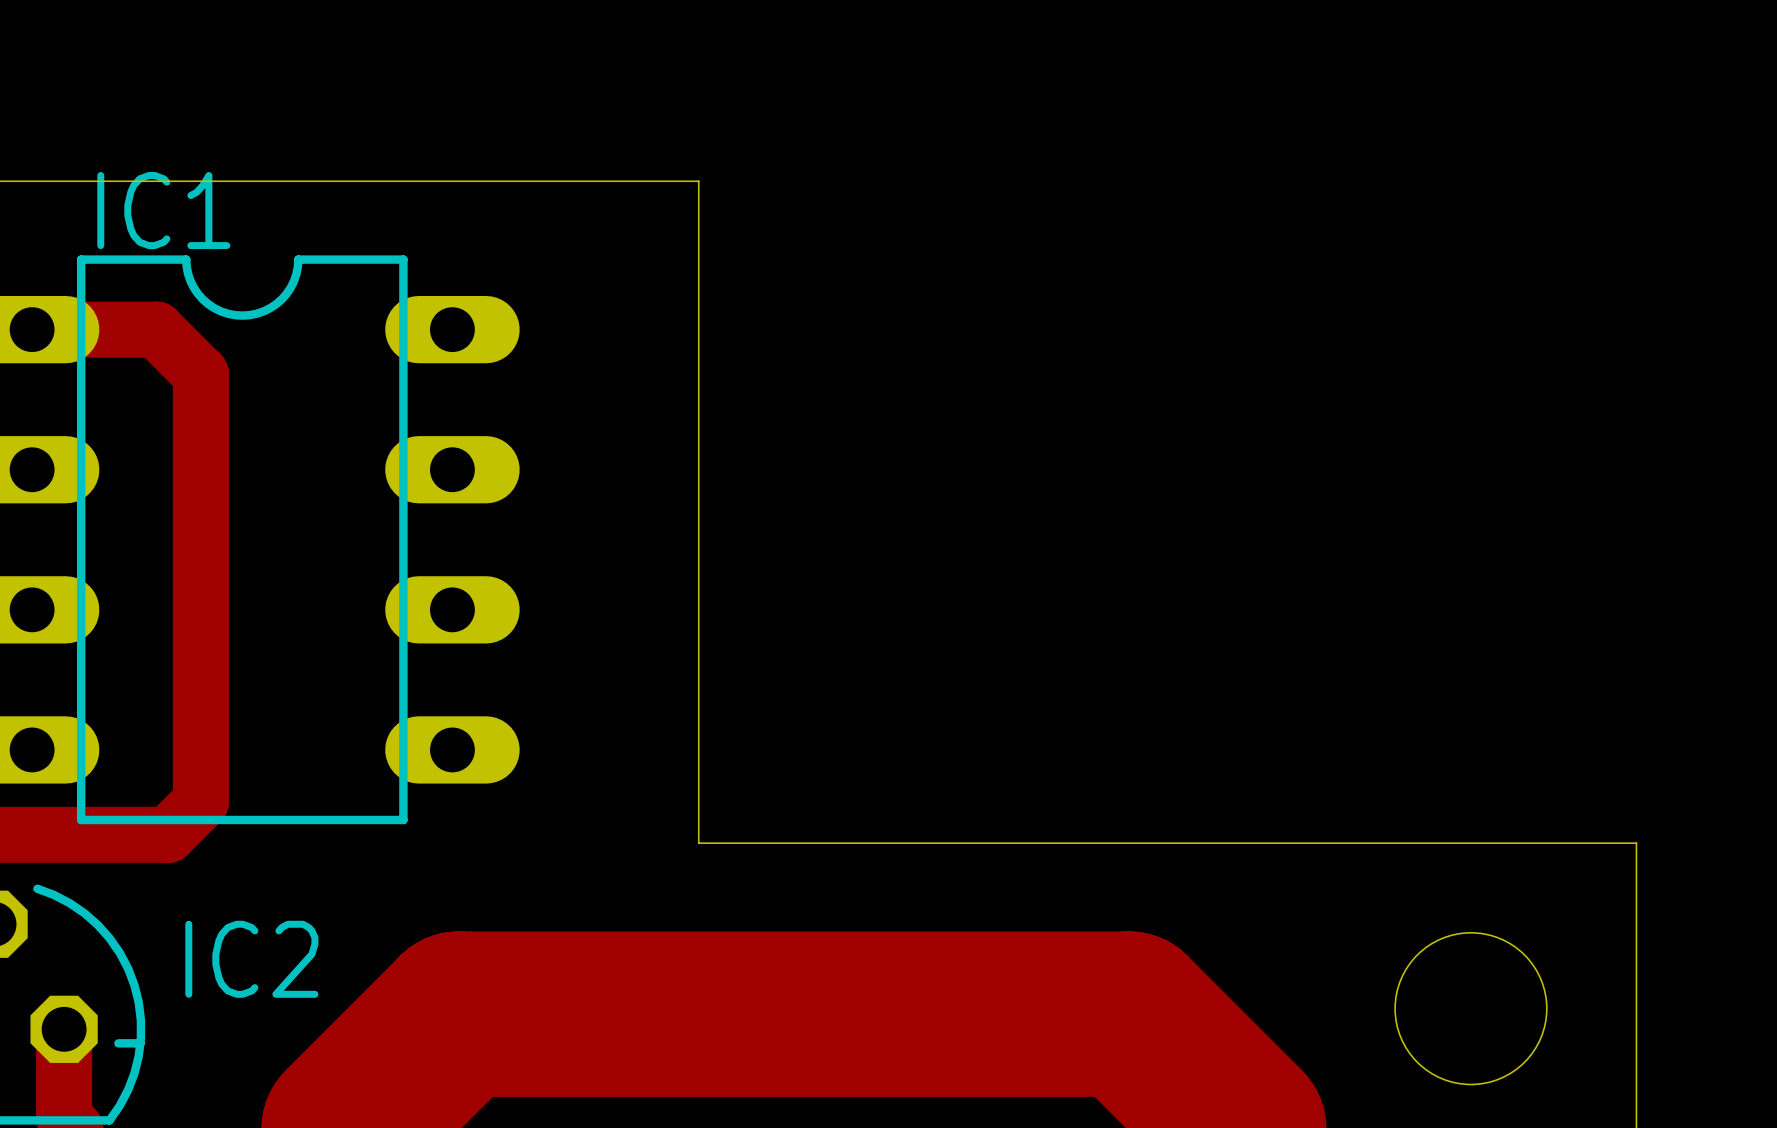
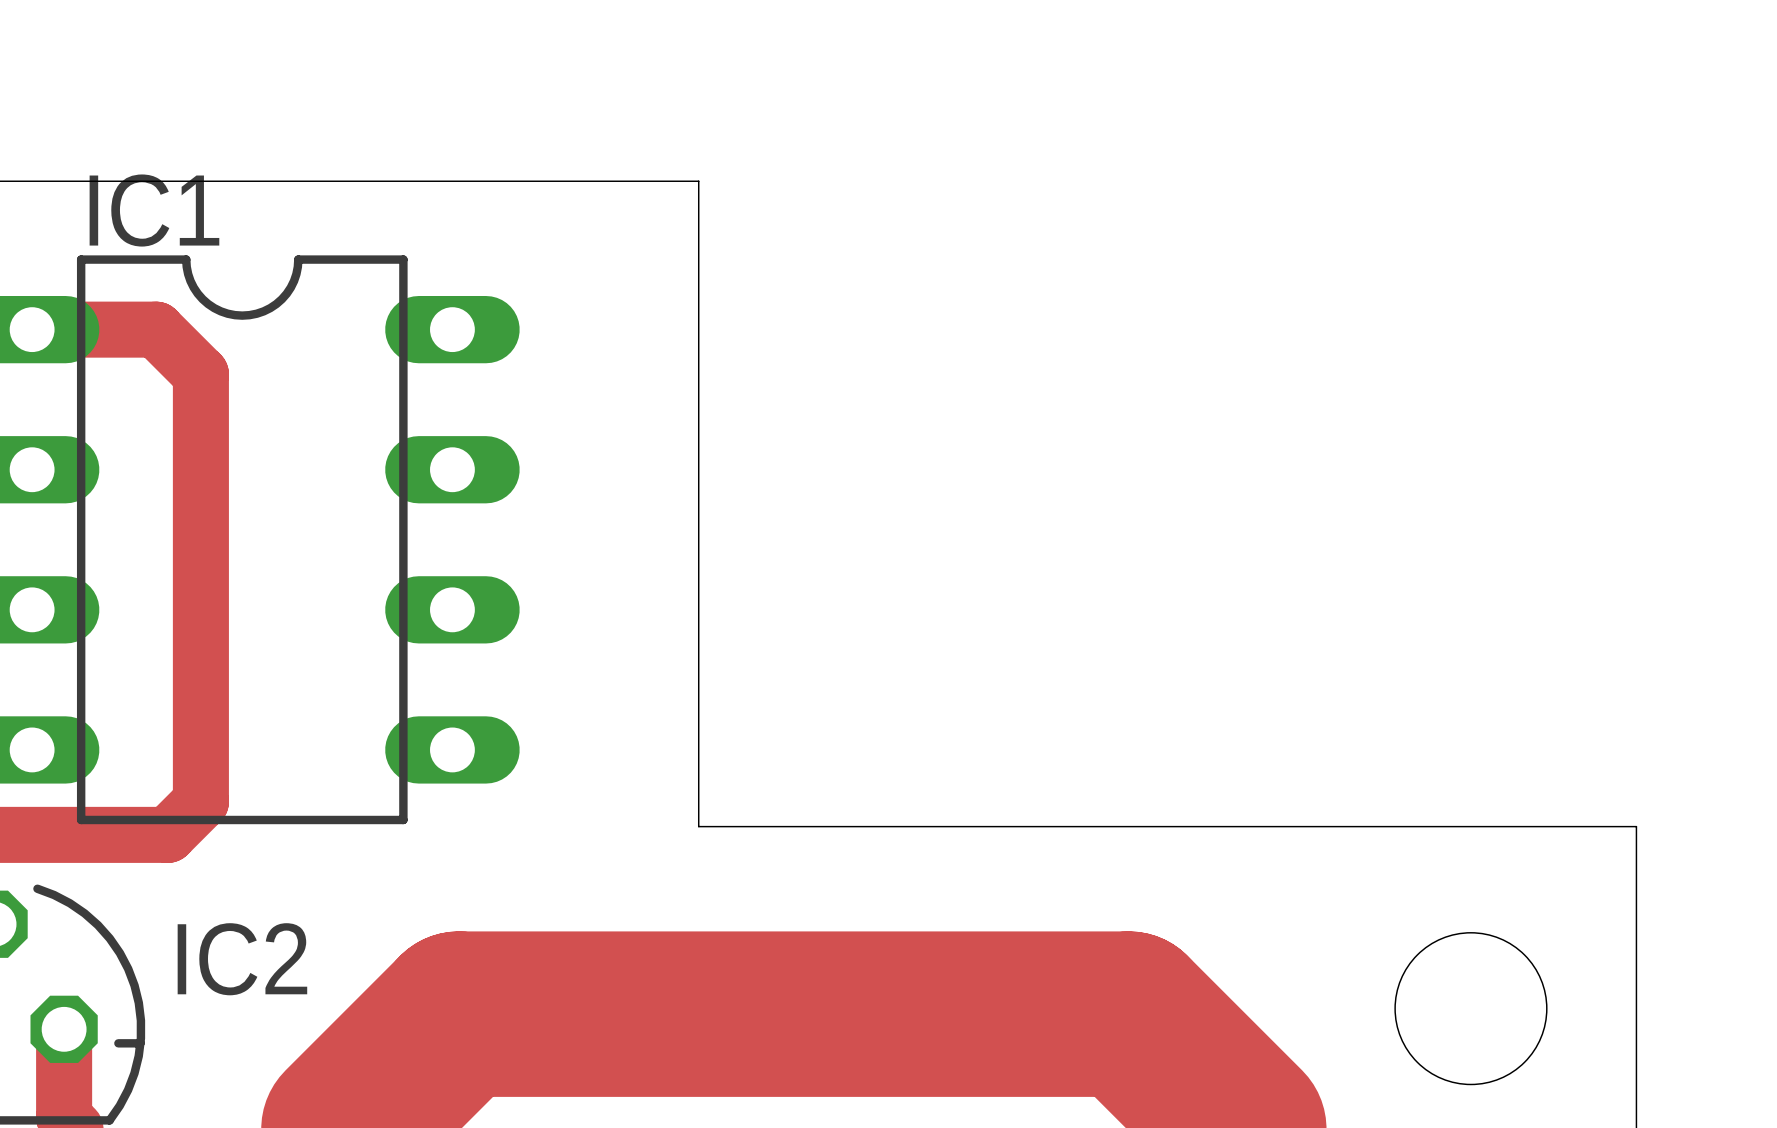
board edge: (698, 826) (698, 843) (1636, 843) -> (698, 826) (1636, 826) (1636, 843)

